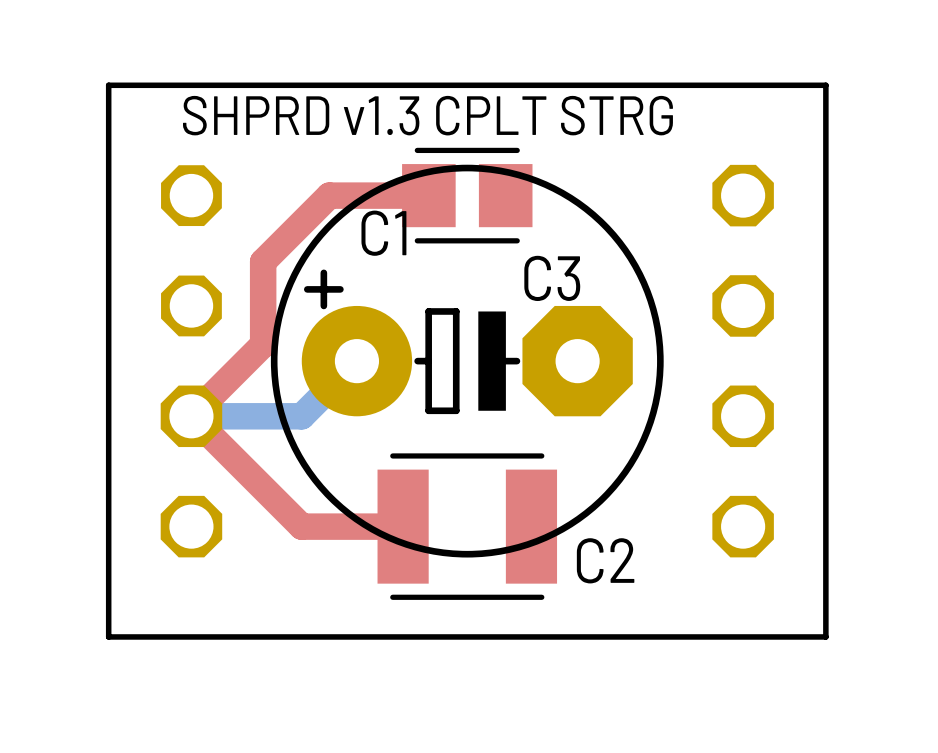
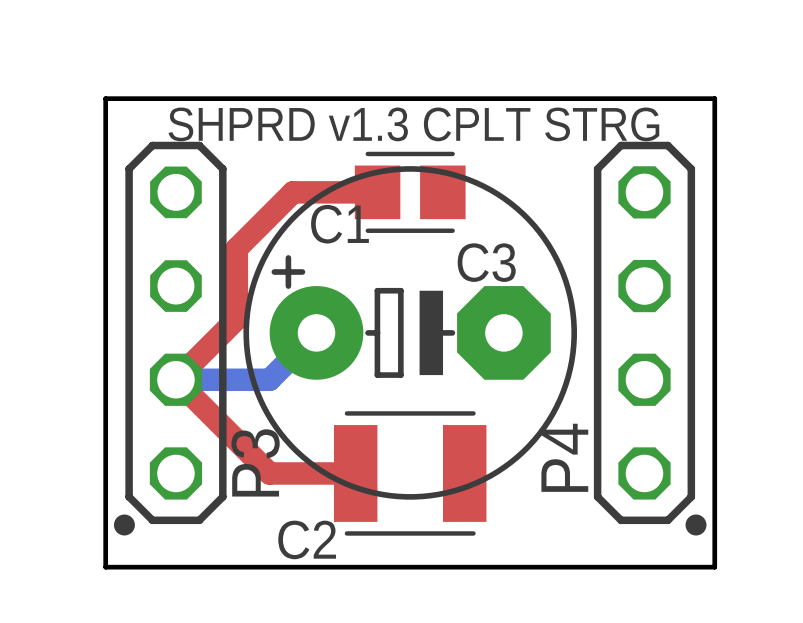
part footprint: [105, 82, 829, 640] -> [103, 96, 718, 570]
C2 name position: C2 (605, 560) -> C2 (307, 539)

